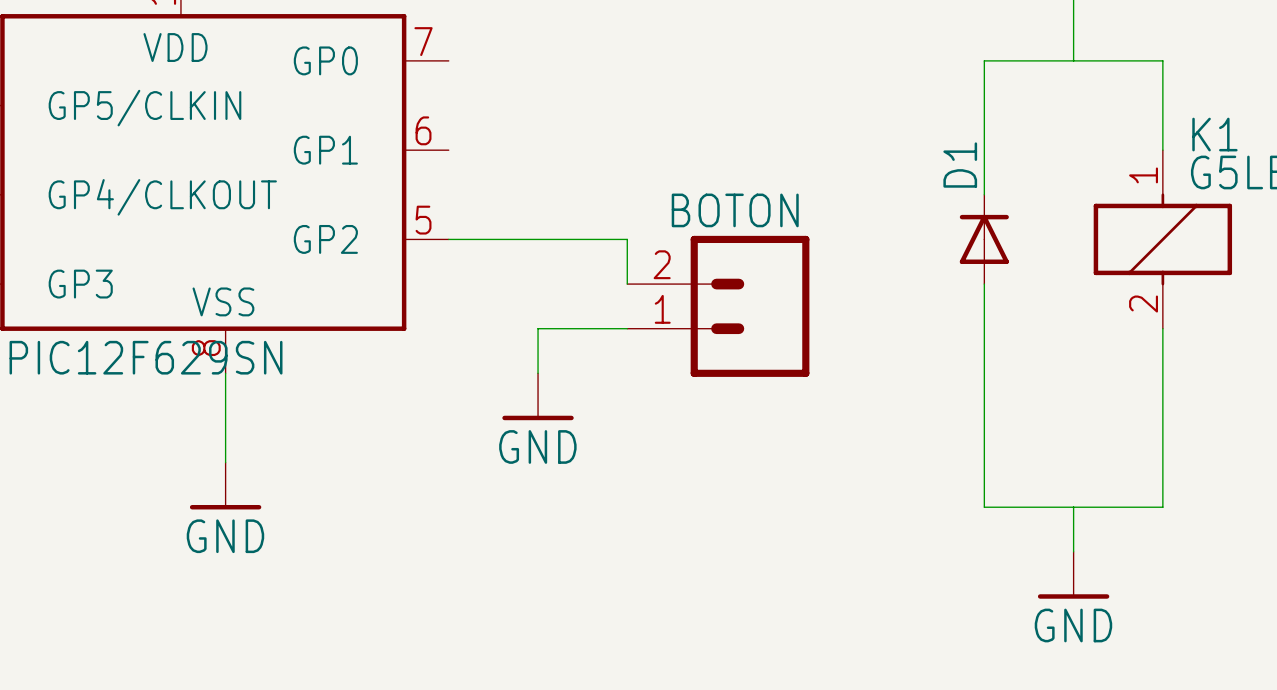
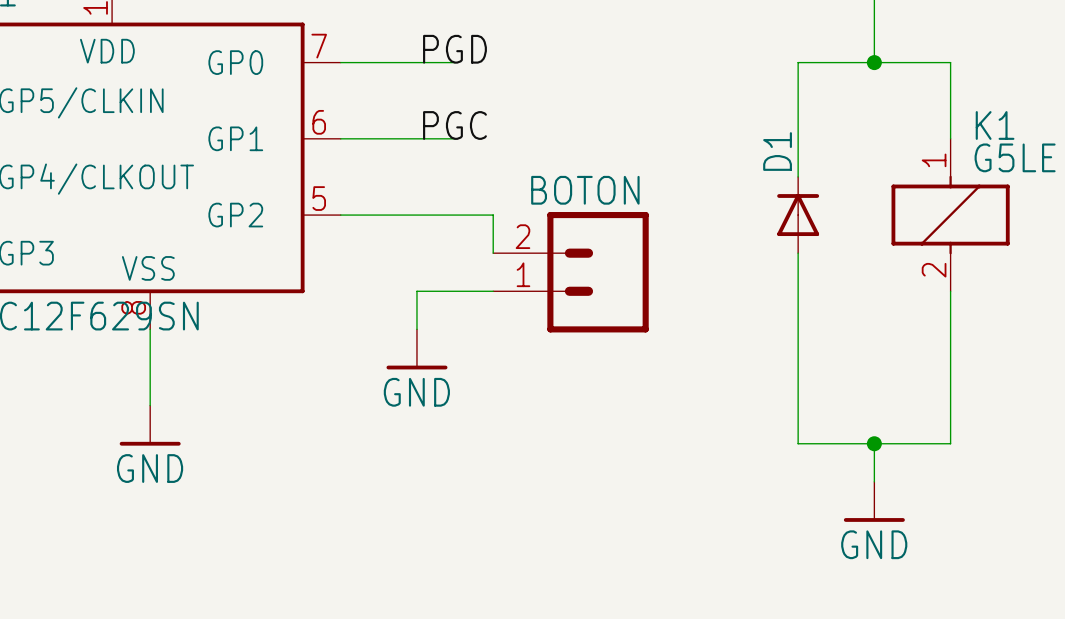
label: none -> PGD (454, 49)
wire: none -> (340, 62) (455, 62)
junction: none -> (874, 62)
label: none -> PGC (454, 125)
wire: none -> (340, 138) (455, 138)
junction: none -> (874, 443)

